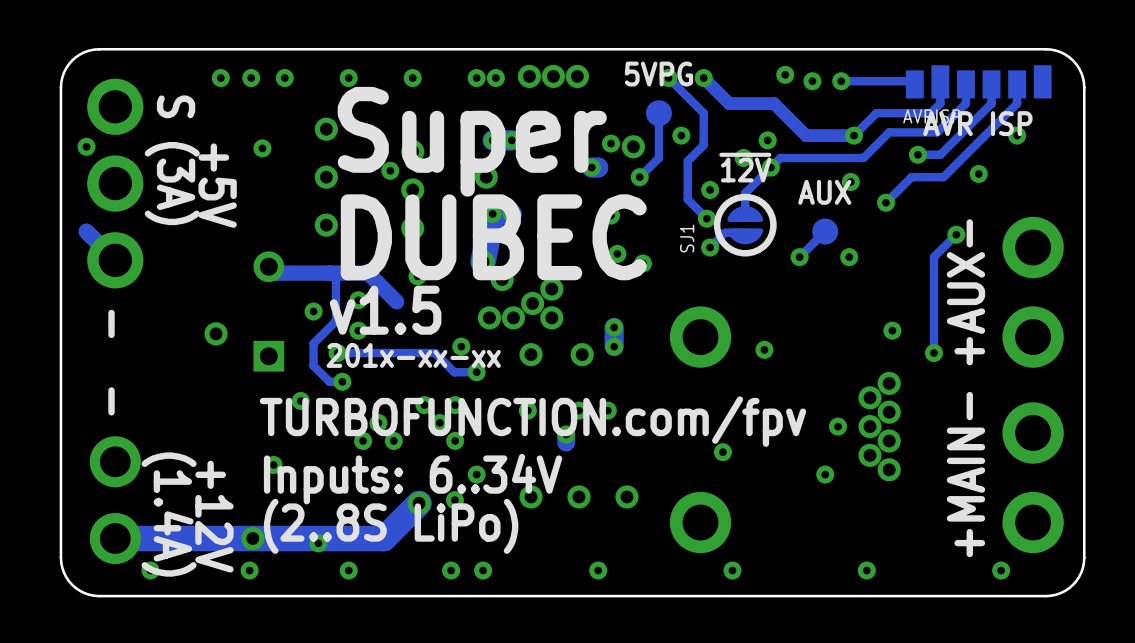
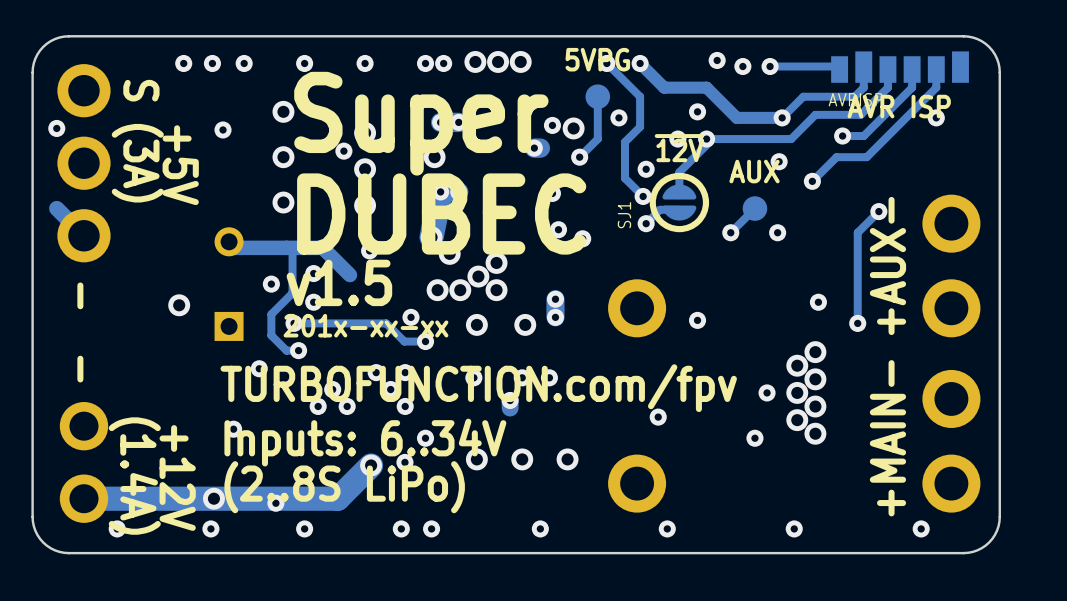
via: none -> (697, 111)
via: (767, 140) -> none
via: none -> (706, 139)
via: (770, 167) -> none
via: (978, 173) -> none

